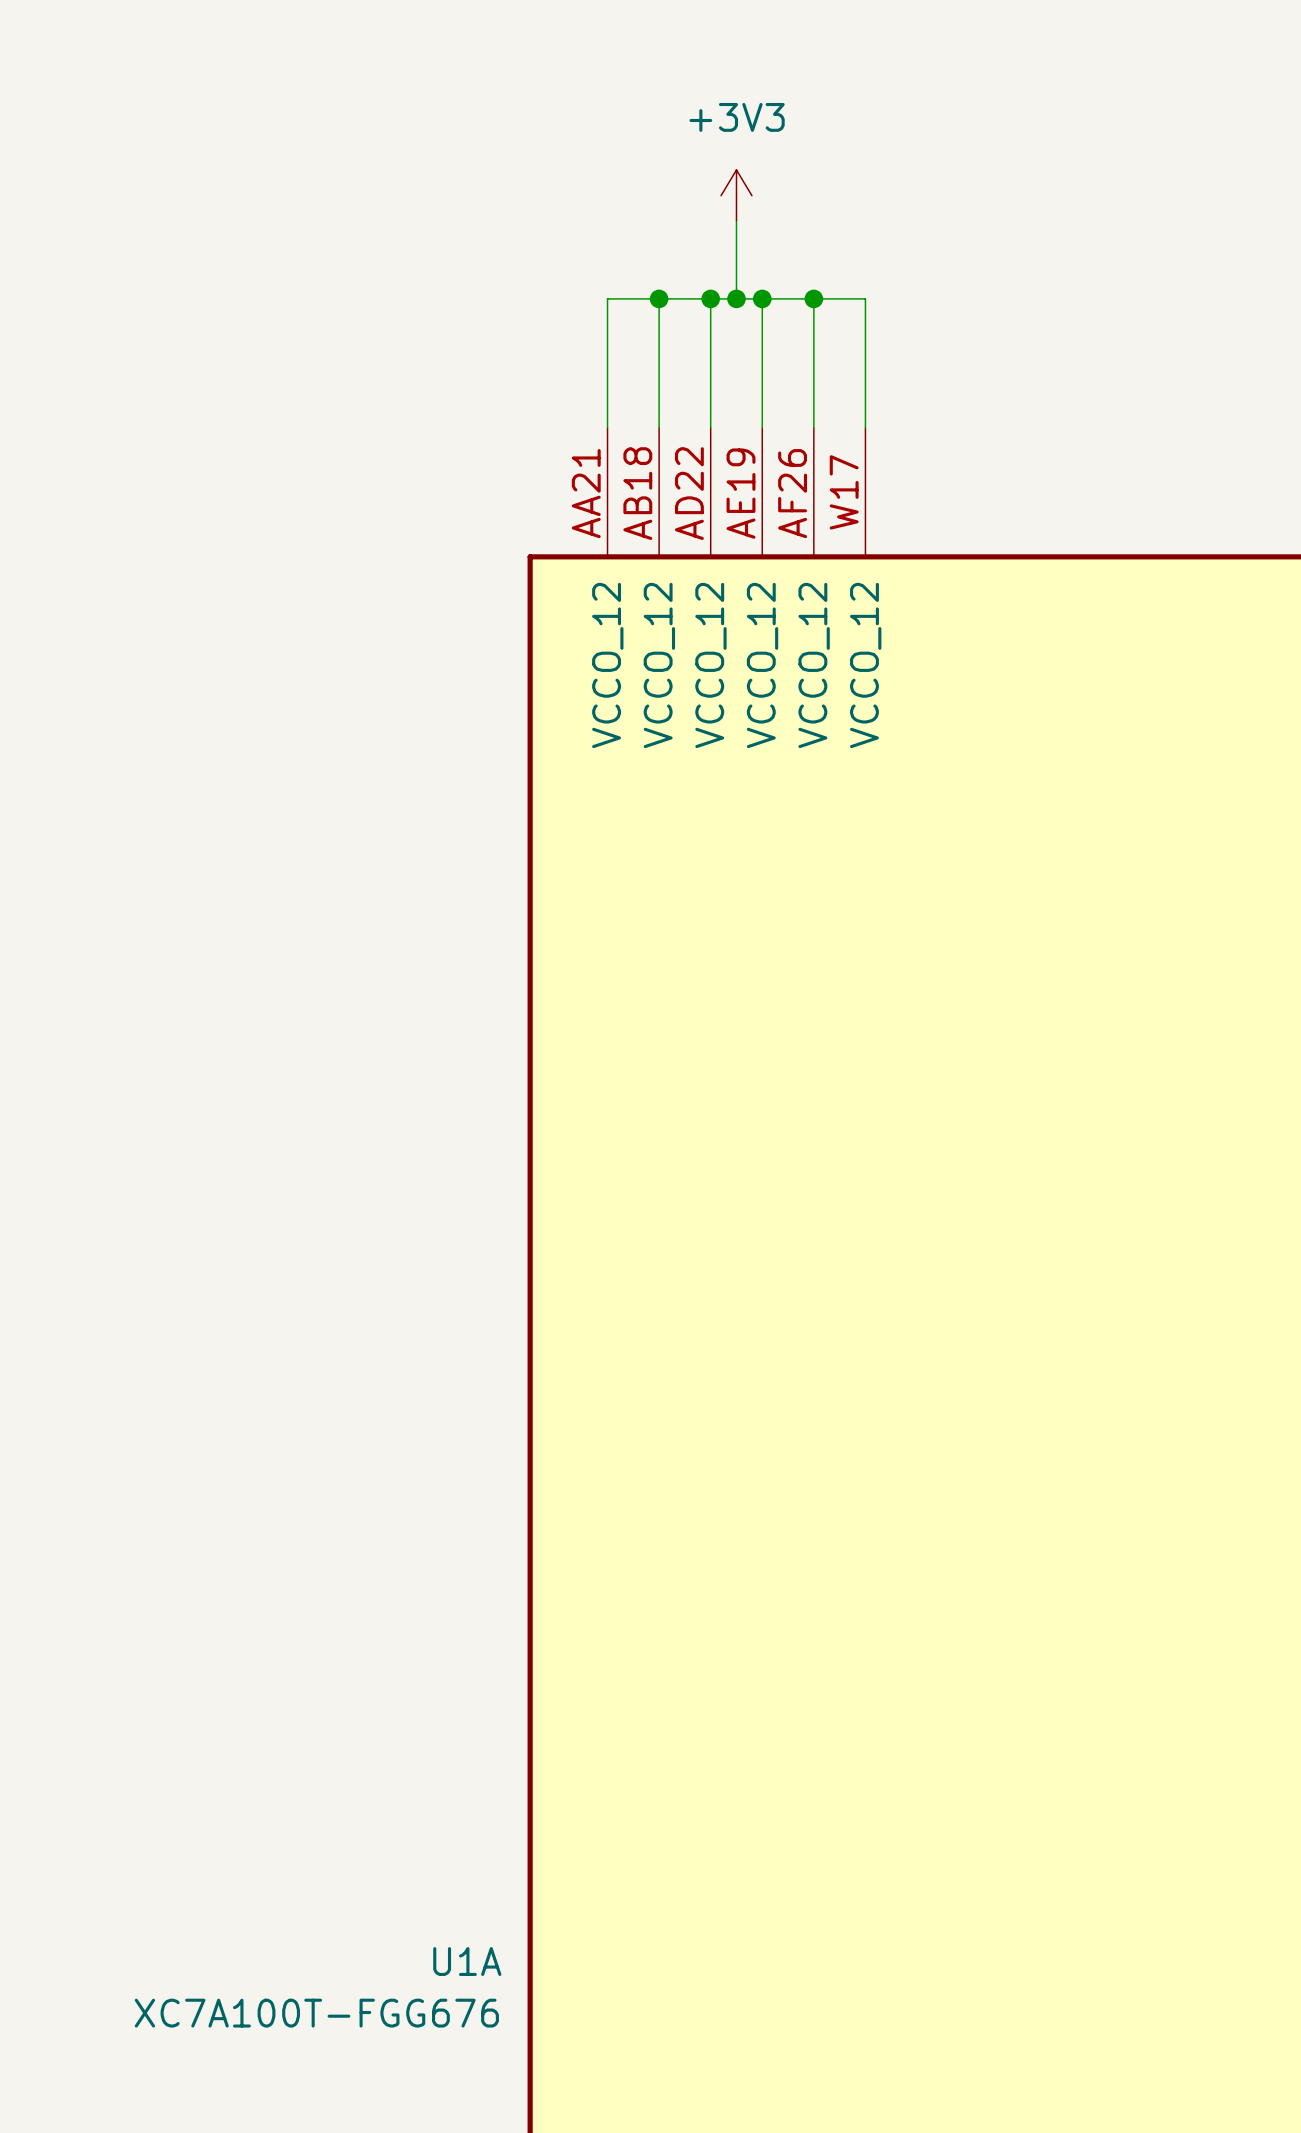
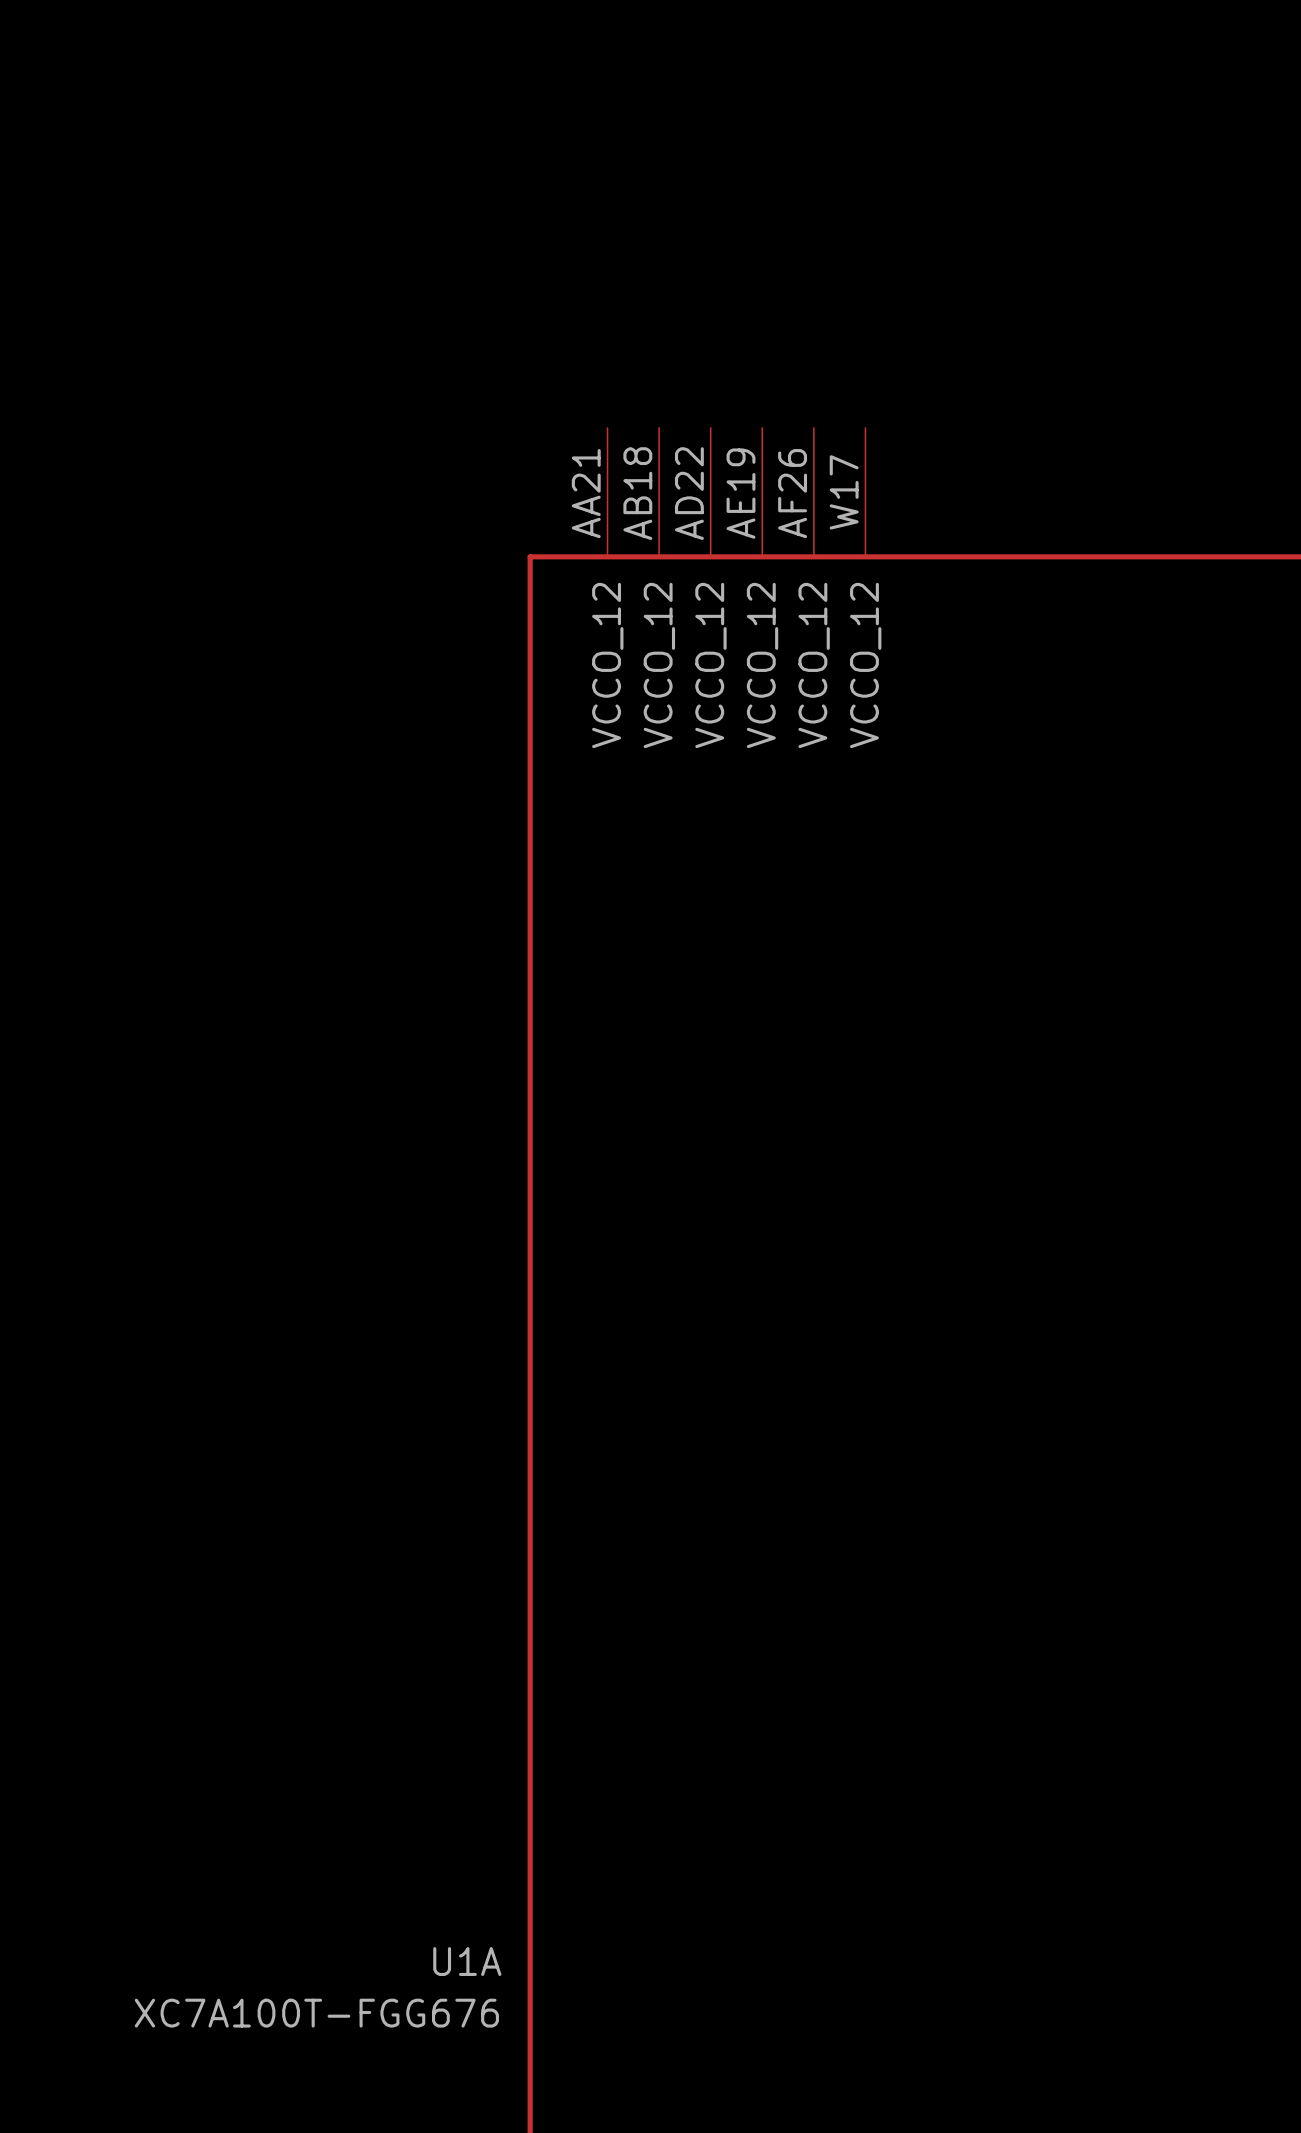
power symbol: +3V3 (736, 195) -> none
wire: (736, 221) (736, 298) -> none
wire: (659, 298) (659, 427) -> none
junction: (659, 298) -> none
wire: (710, 298) (710, 427) -> none
junction: (710, 298) -> none
junction: (736, 298) -> none
wire: (762, 298) (762, 427) -> none
junction: (762, 298) -> none
wire: (813, 298) (813, 427) -> none
junction: (813, 298) -> none
wire: (607, 427) (607, 298) (865, 298) (865, 427) -> none

